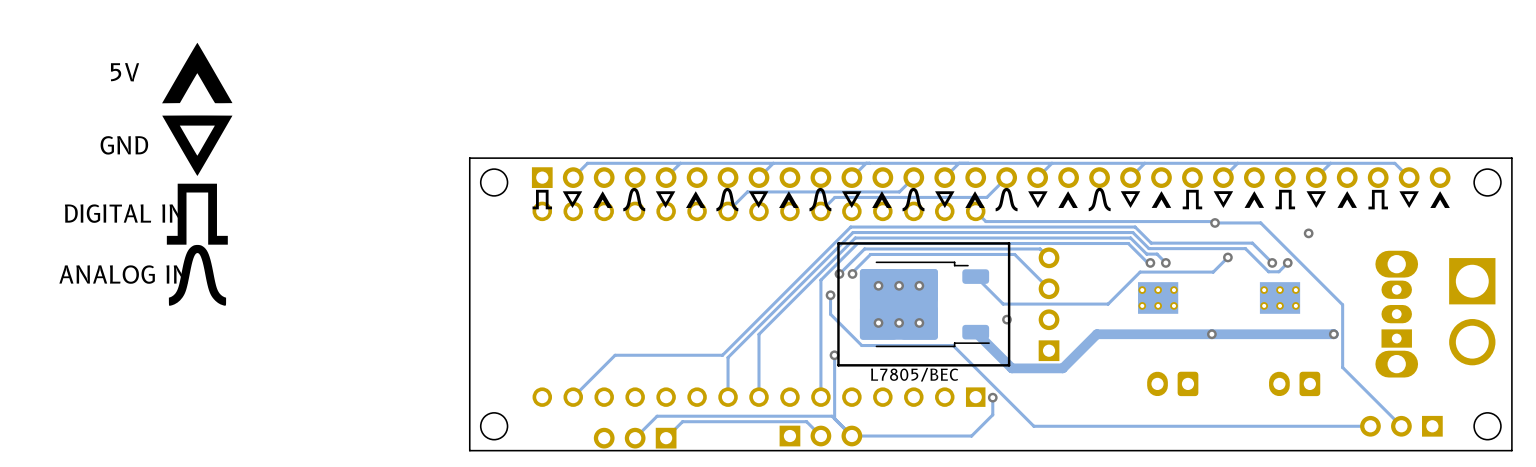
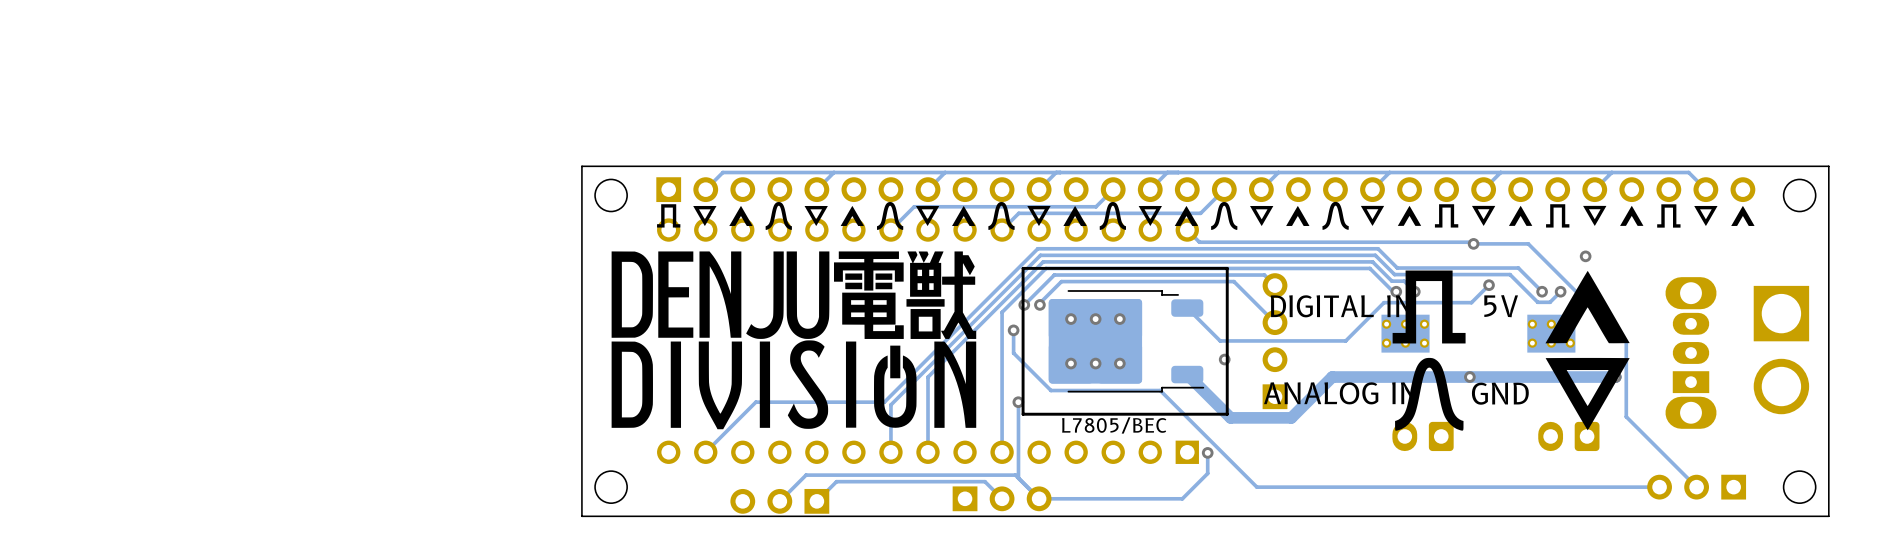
5V position: (197, 73) -> (1587, 307)
GND: (197, 145) -> none
DIGITAL IN: (197, 214) -> none
drawing: none -> [611, 251, 977, 430]
ANALOG IN: (197, 275) -> none
DIGITAL IN: none -> (1429, 306)
ANALOG IN: none -> (1429, 394)
GND: none -> (1587, 394)

